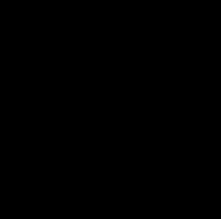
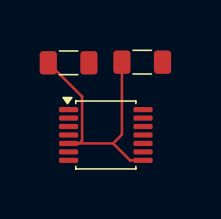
top track: none -> (48, 62) (82, 96) (82, 140) (79, 143)
part: none -> (68, 62)
top track: none -> (121, 62) (121, 134) (113, 143)
part: none -> (142, 62)
part: none -> (105, 133)
top track: none -> (68, 143) (113, 143)
top track: none -> (113, 143) (130, 160) (143, 160)

